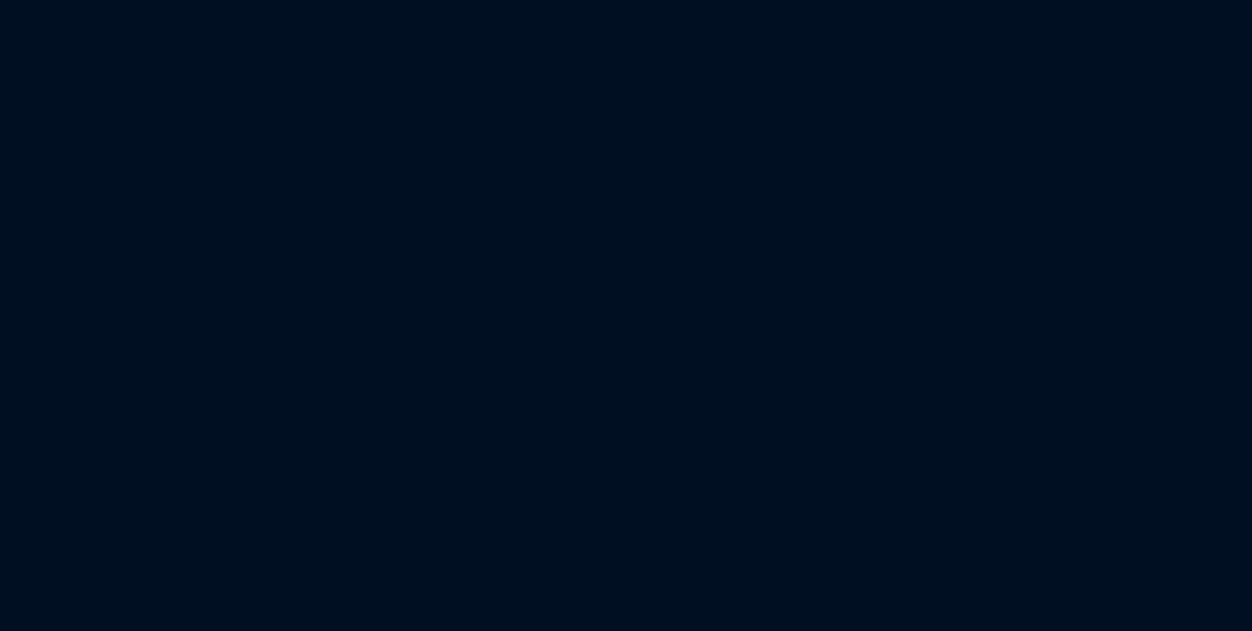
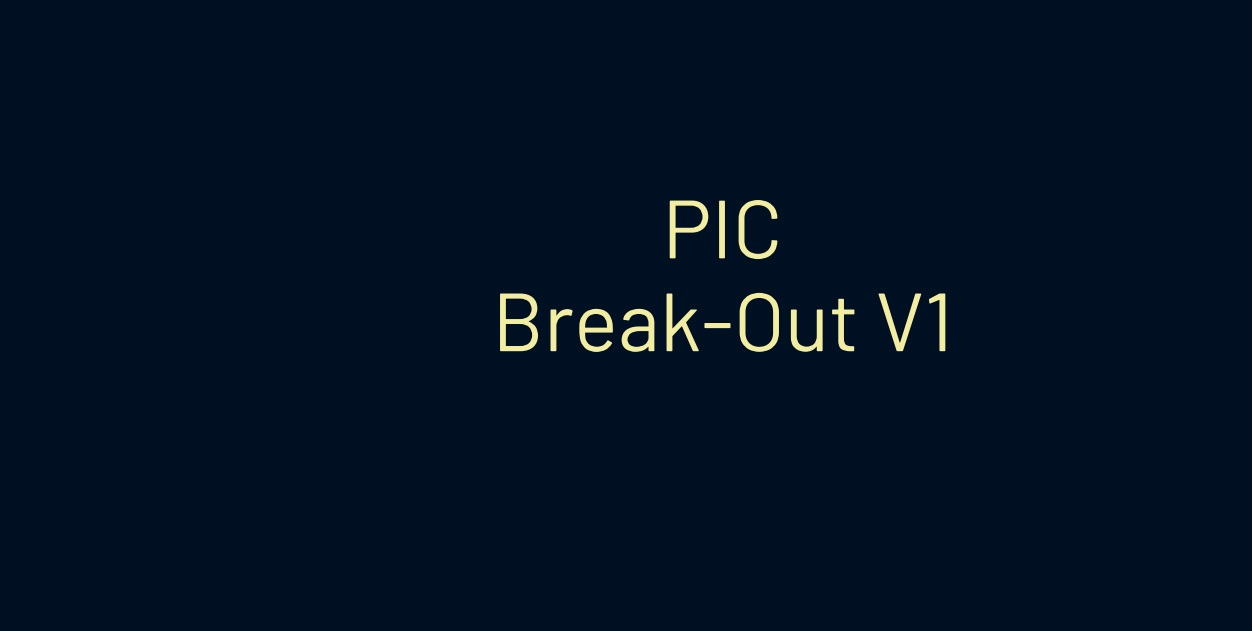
text: none -> PIC (723, 229)
text: none -> Break-Out V1 (722, 322)

